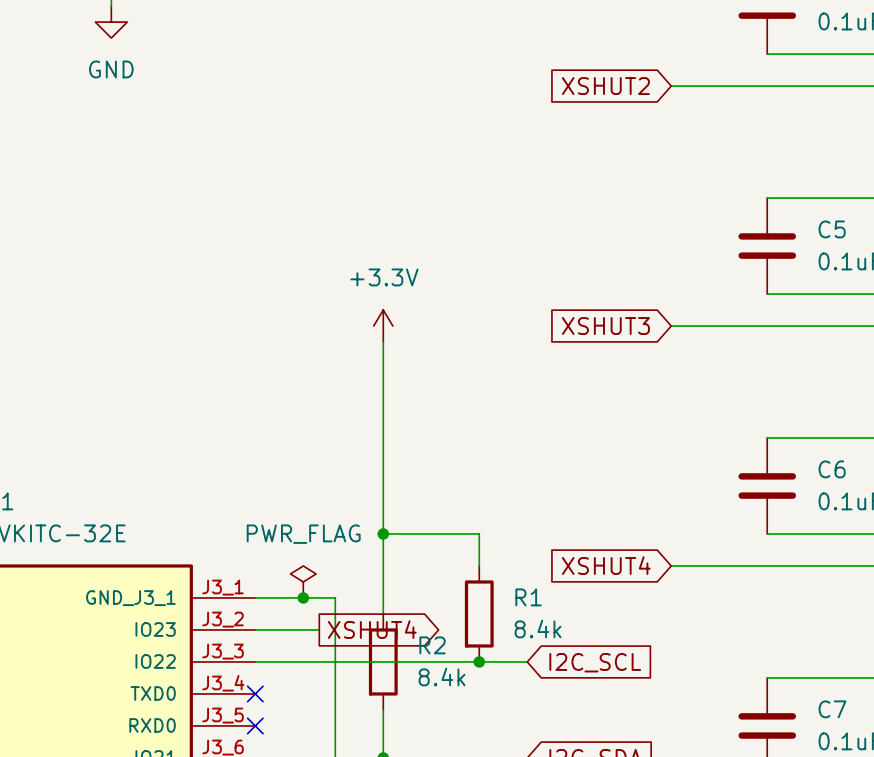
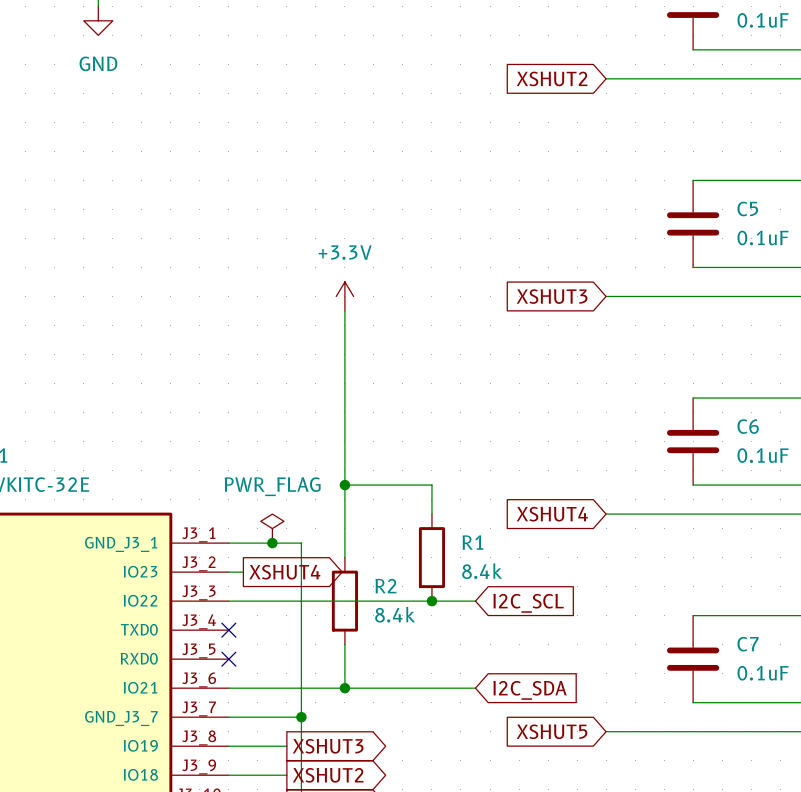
wire: (271, 629) (319, 629) -> none
global label position: XSHUT4 (372, 629) -> XSHUT4 (284, 572)

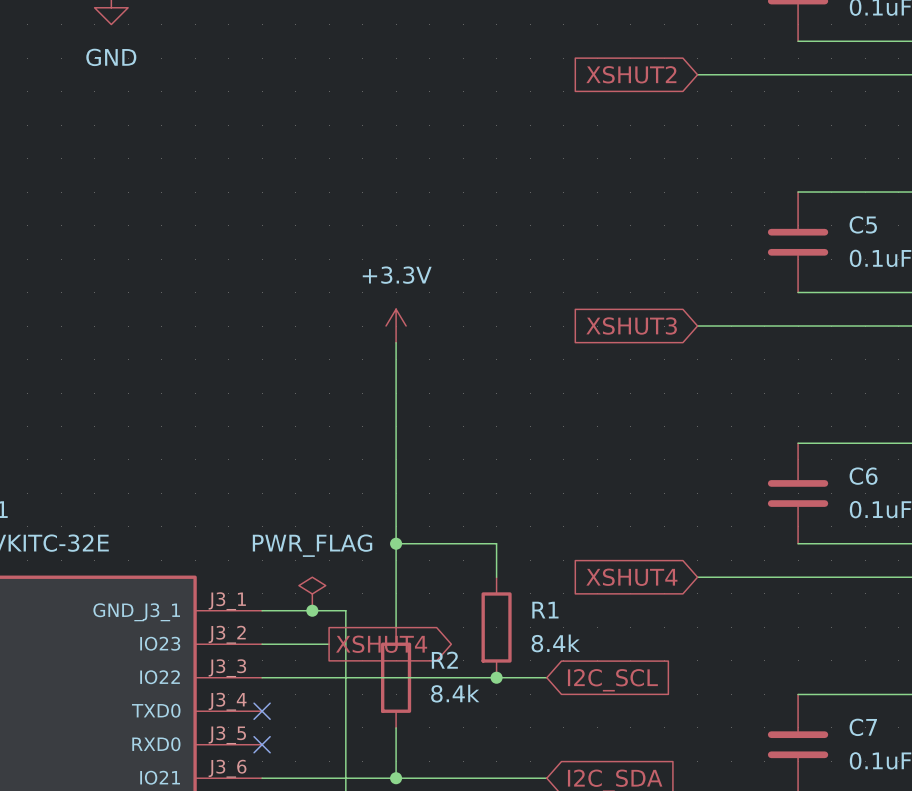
wire: none -> (278, 644) (329, 644)
global label position: XSHUT4 (284, 572) -> XSHUT4 (381, 644)

